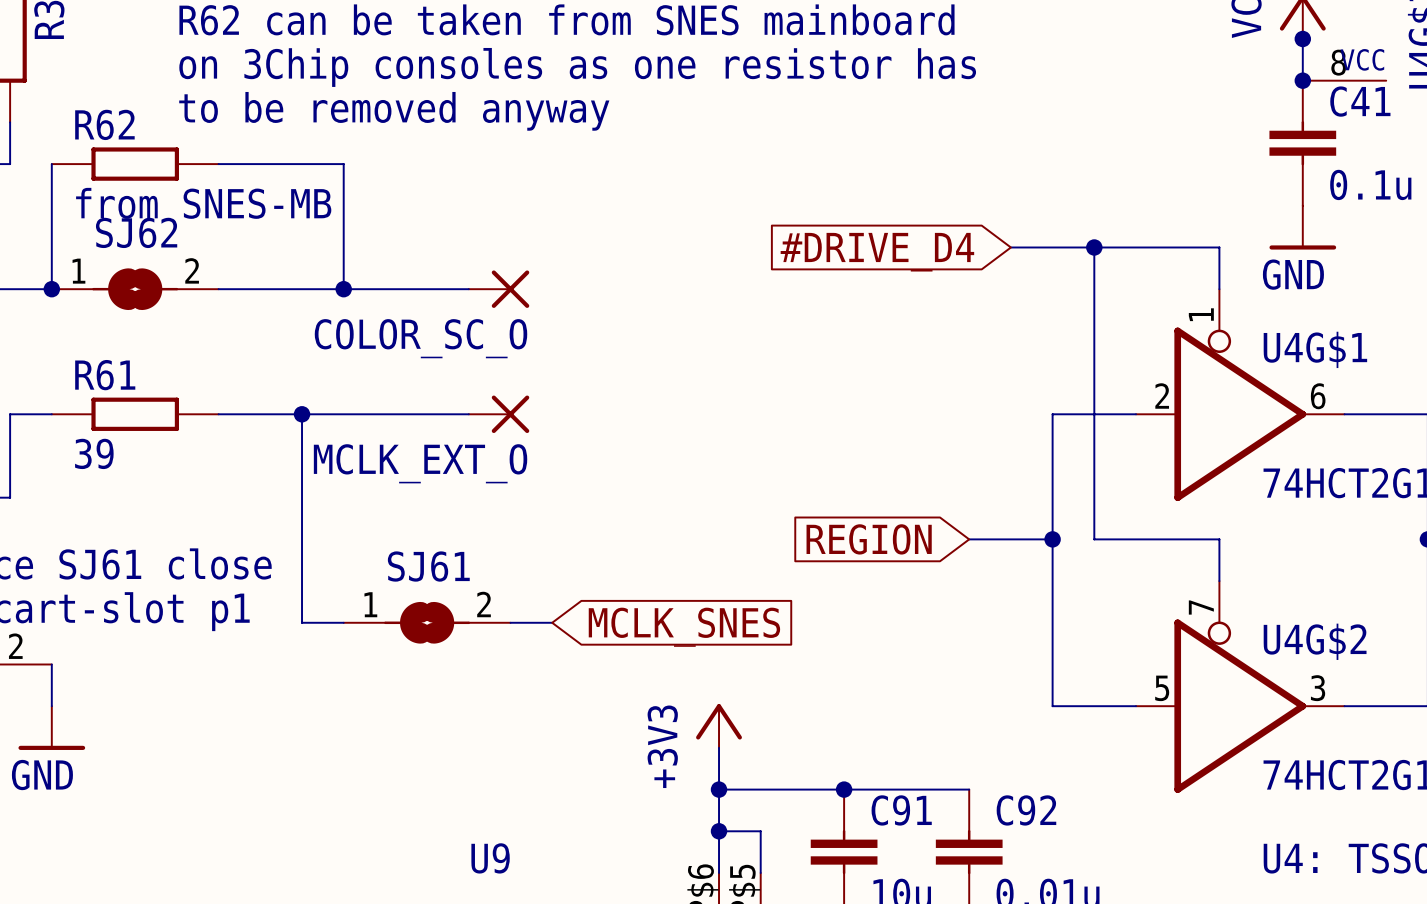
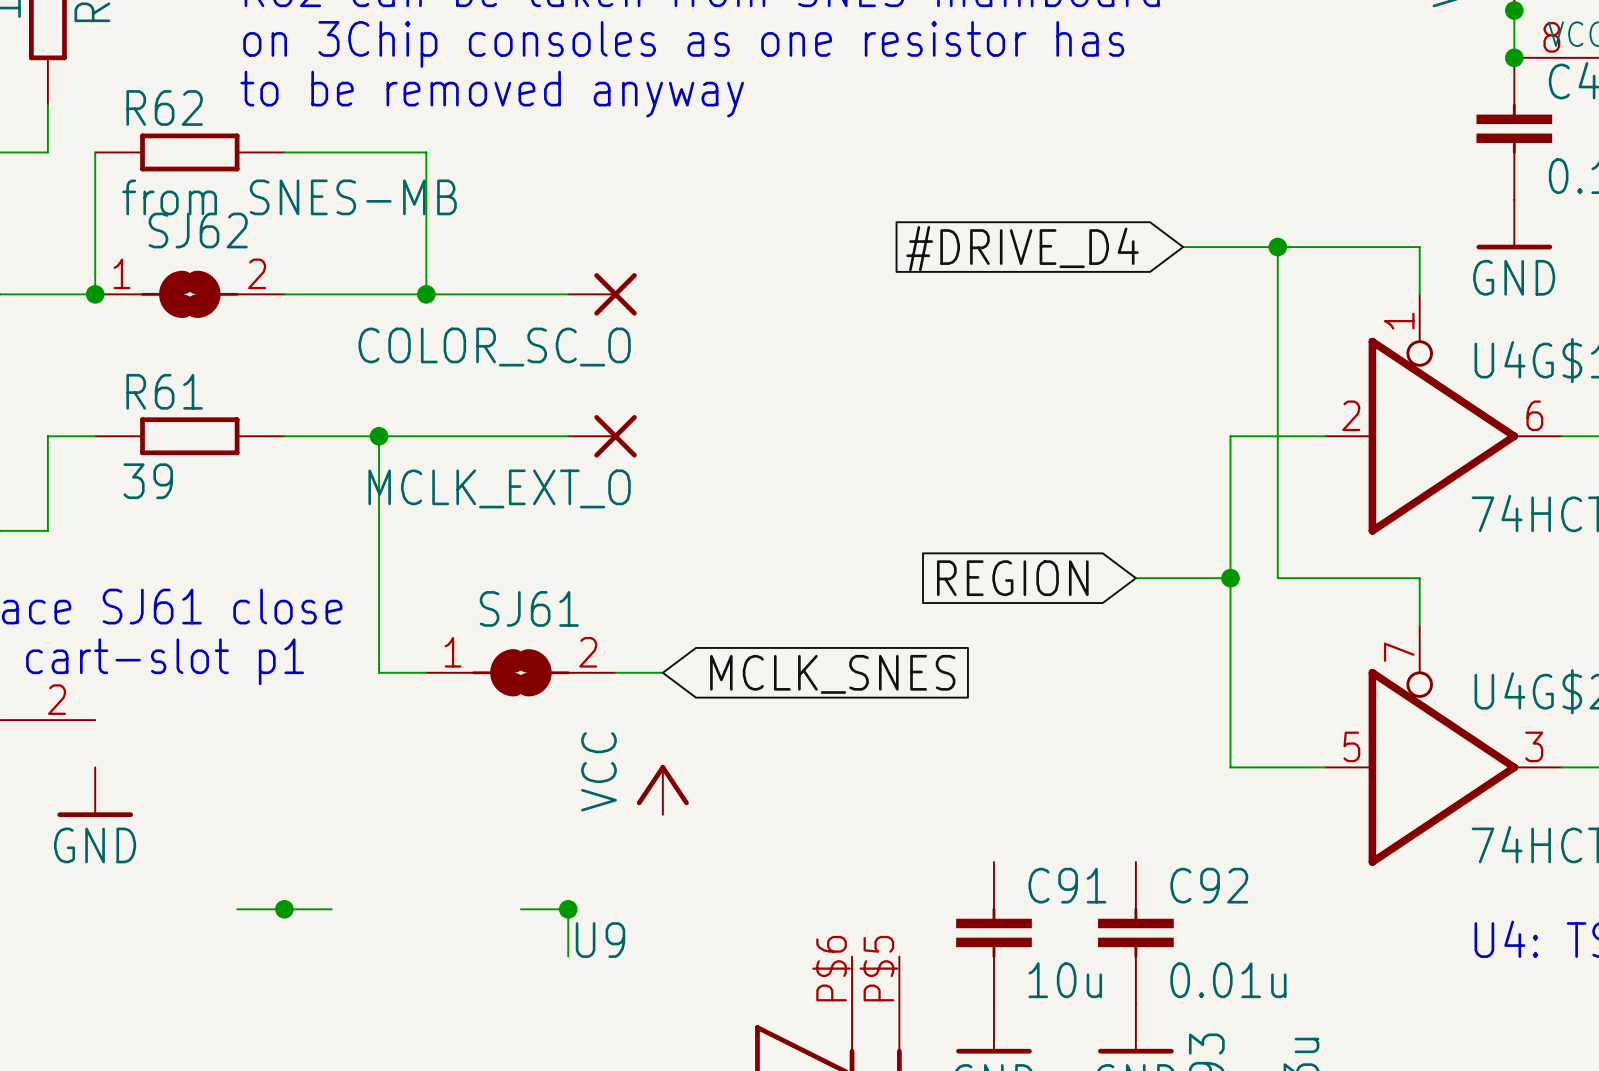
wire: (51, 664) (51, 706) -> none
power symbol: none -> VCC (662, 789)
power symbol: +3V3 (719, 725) -> none
wire: (719, 747) (719, 872) -> none
wire: (719, 789) (969, 789) -> none
junction: (719, 789) -> none
junction: (844, 789) -> none
wire: none -> (237, 909) (331, 909)
junction: none -> (284, 909)
junction: none -> (568, 909)
wire: (719, 831) (760, 831) (760, 872) -> (520, 909) (568, 909) (568, 956)
junction: (719, 831) -> none

